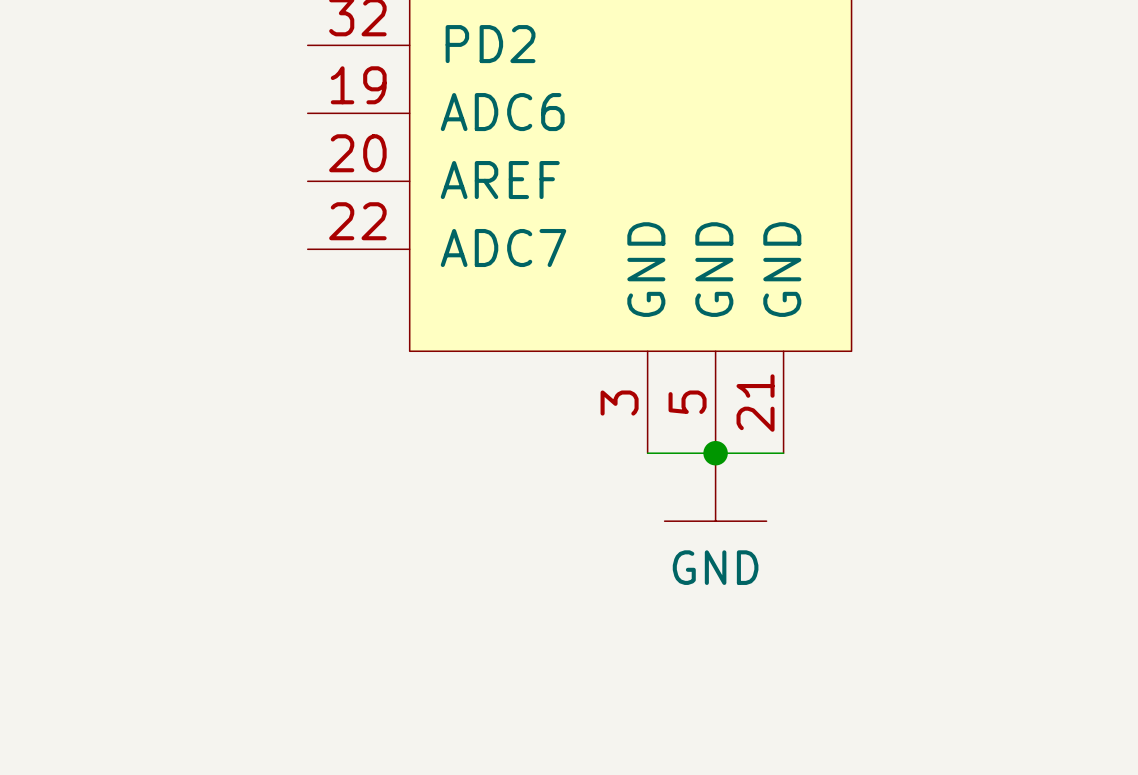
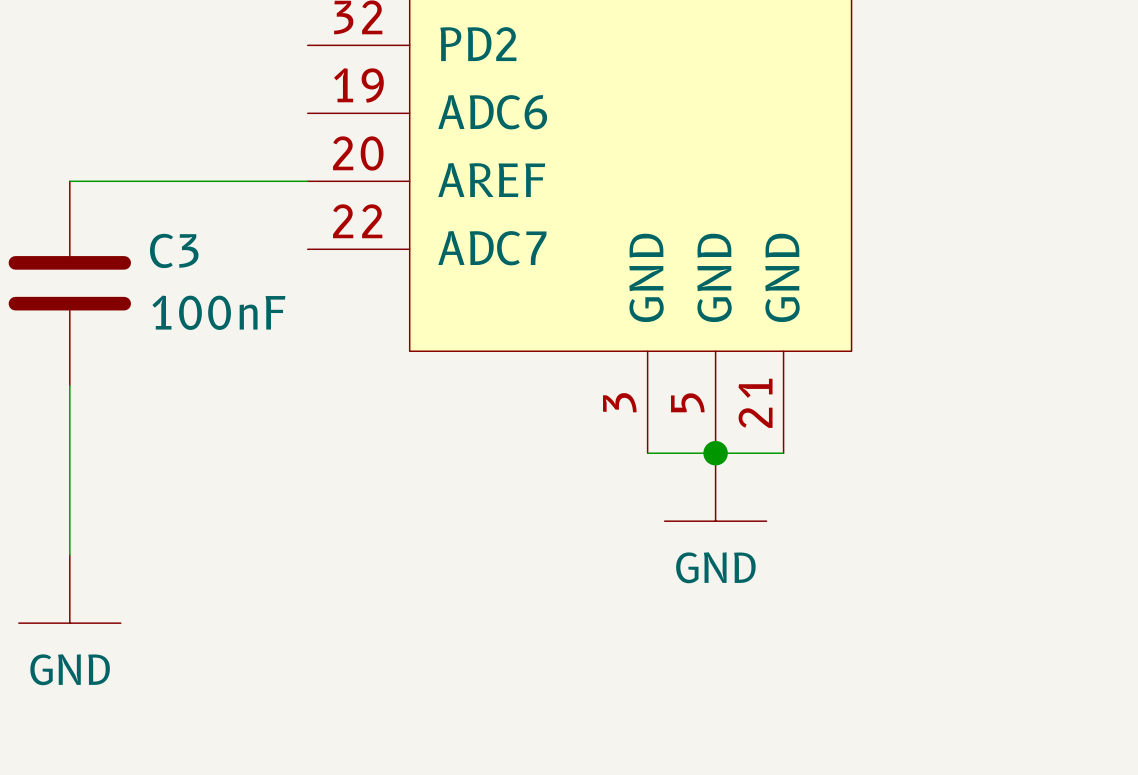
wire: none -> (69, 181) (307, 181)
C3: none -> 100nF (69, 283)
wire: none -> (69, 385) (69, 555)
power symbol: none -> GND (69, 589)

